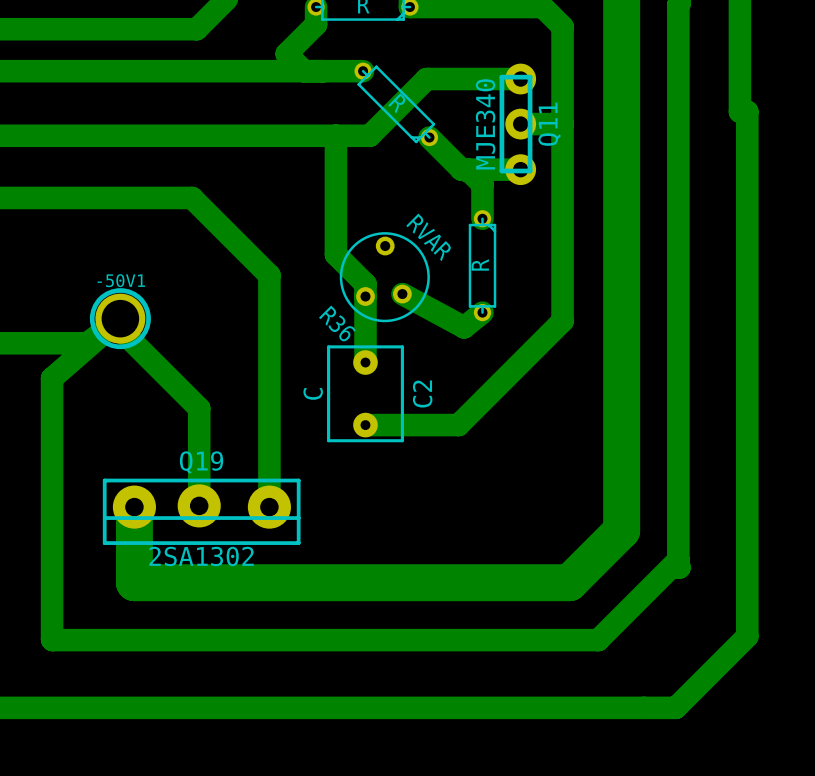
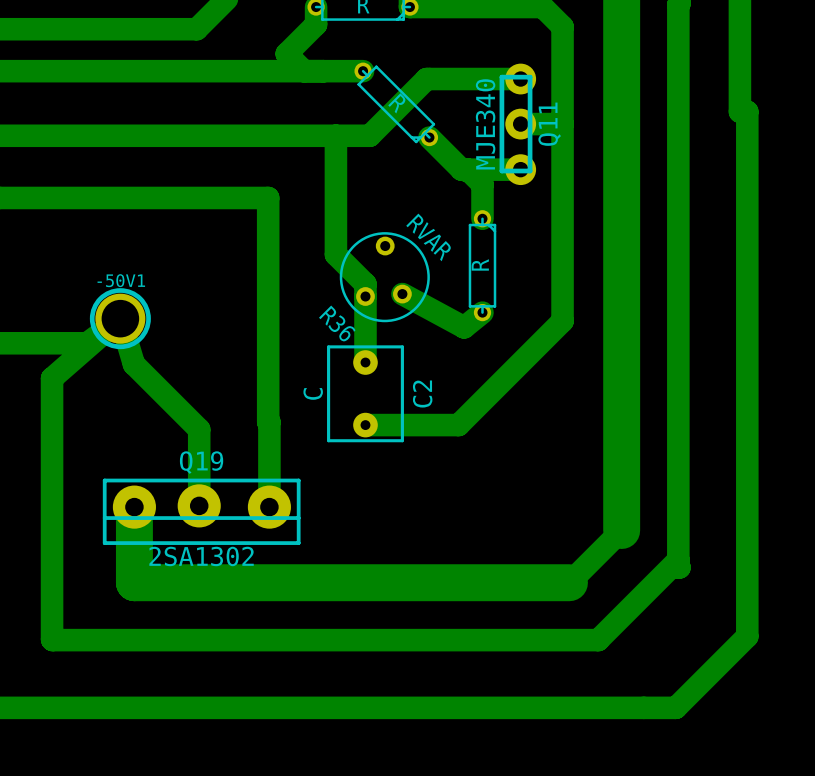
bottom track: (192, 197) (269, 275) (269, 422) -> (192, 197) (268, 197) (269, 422)
bottom track: (120, 318) (120, 329) (199, 408) (199, 429) -> (120, 318) (133, 364) (199, 429)
bottom track width: thick (621, 530) (569, 582) -> thin (621, 530) (569, 582)

